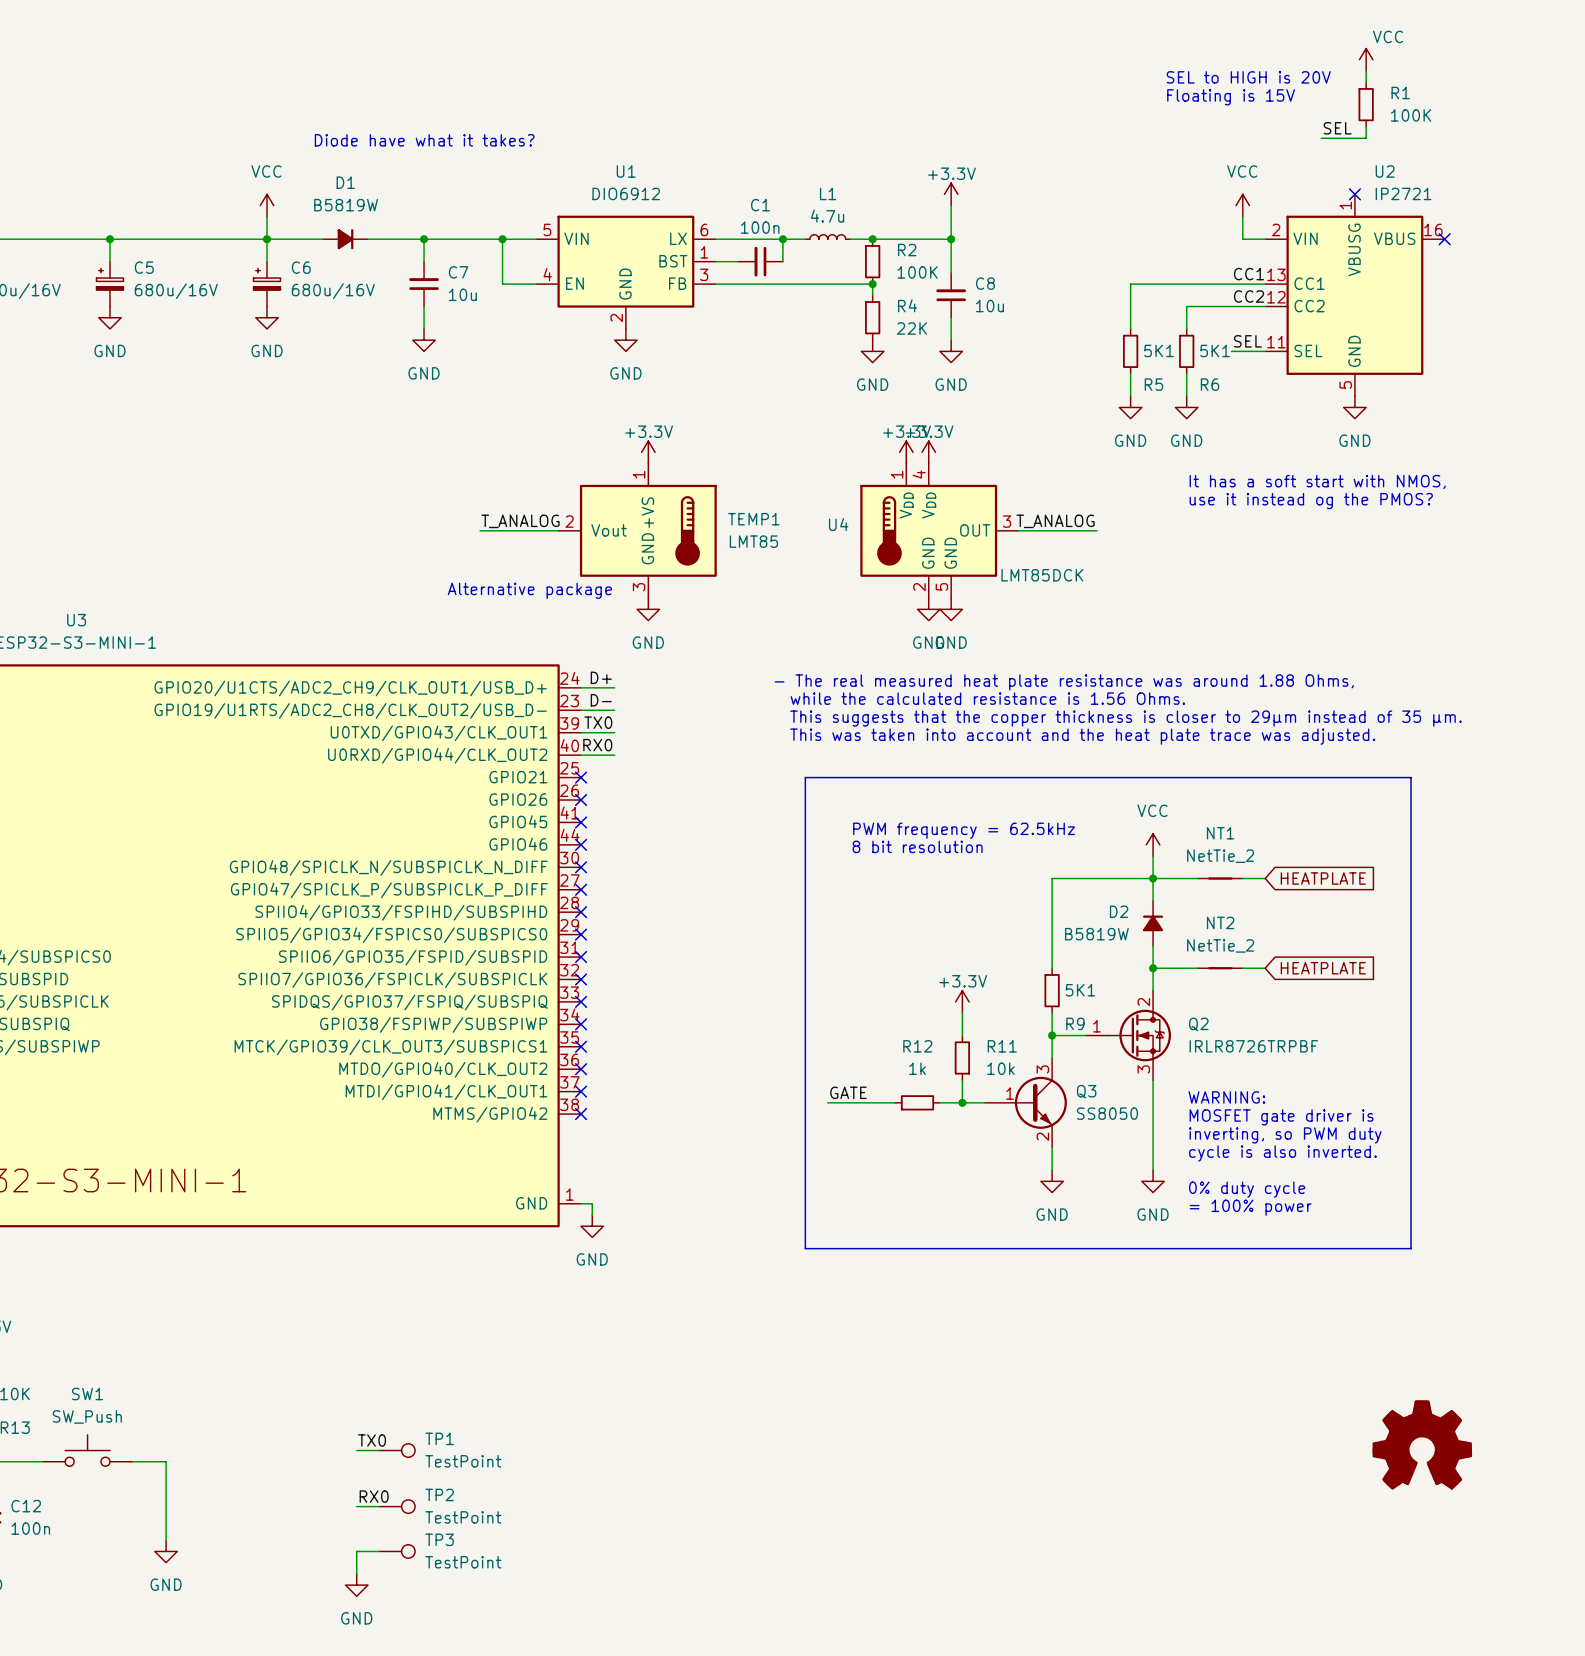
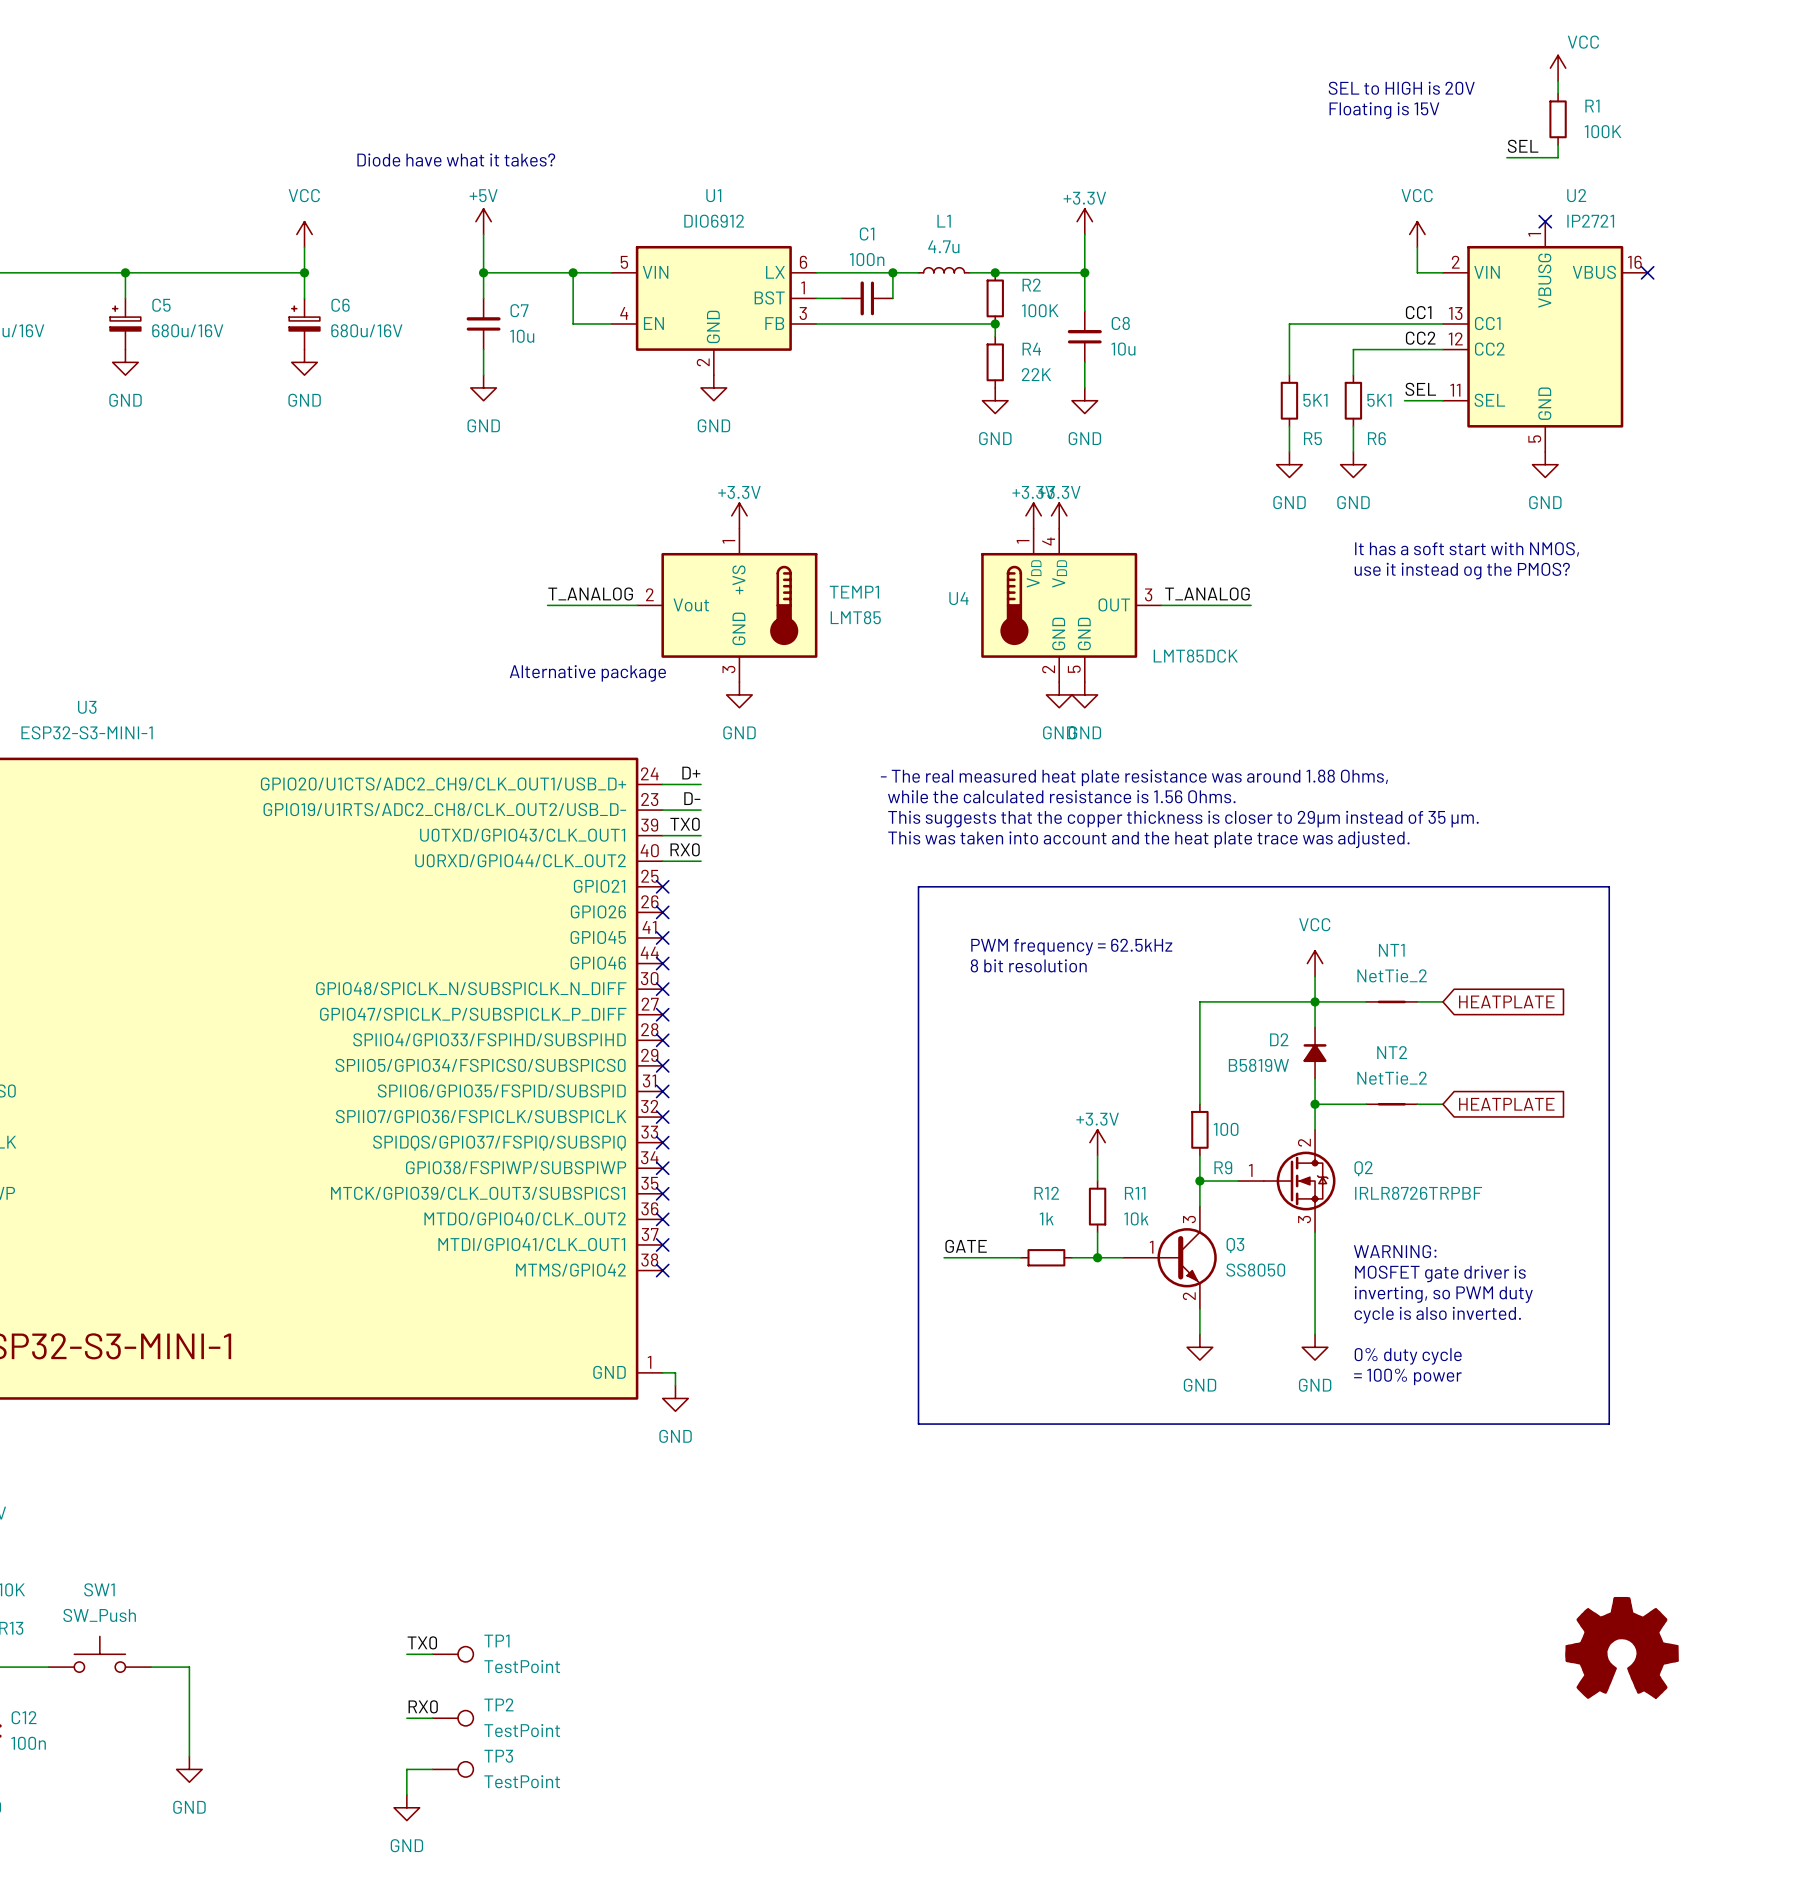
power symbol: none -> +5V (483, 221)
wire: (267, 239) (323, 239) -> none
D1: B5819W (345, 239) -> none
wire: (367, 239) (424, 239) -> (483, 234) (483, 272)
R9 value: 5K1 (1080, 990) -> 100 (1226, 1129)

